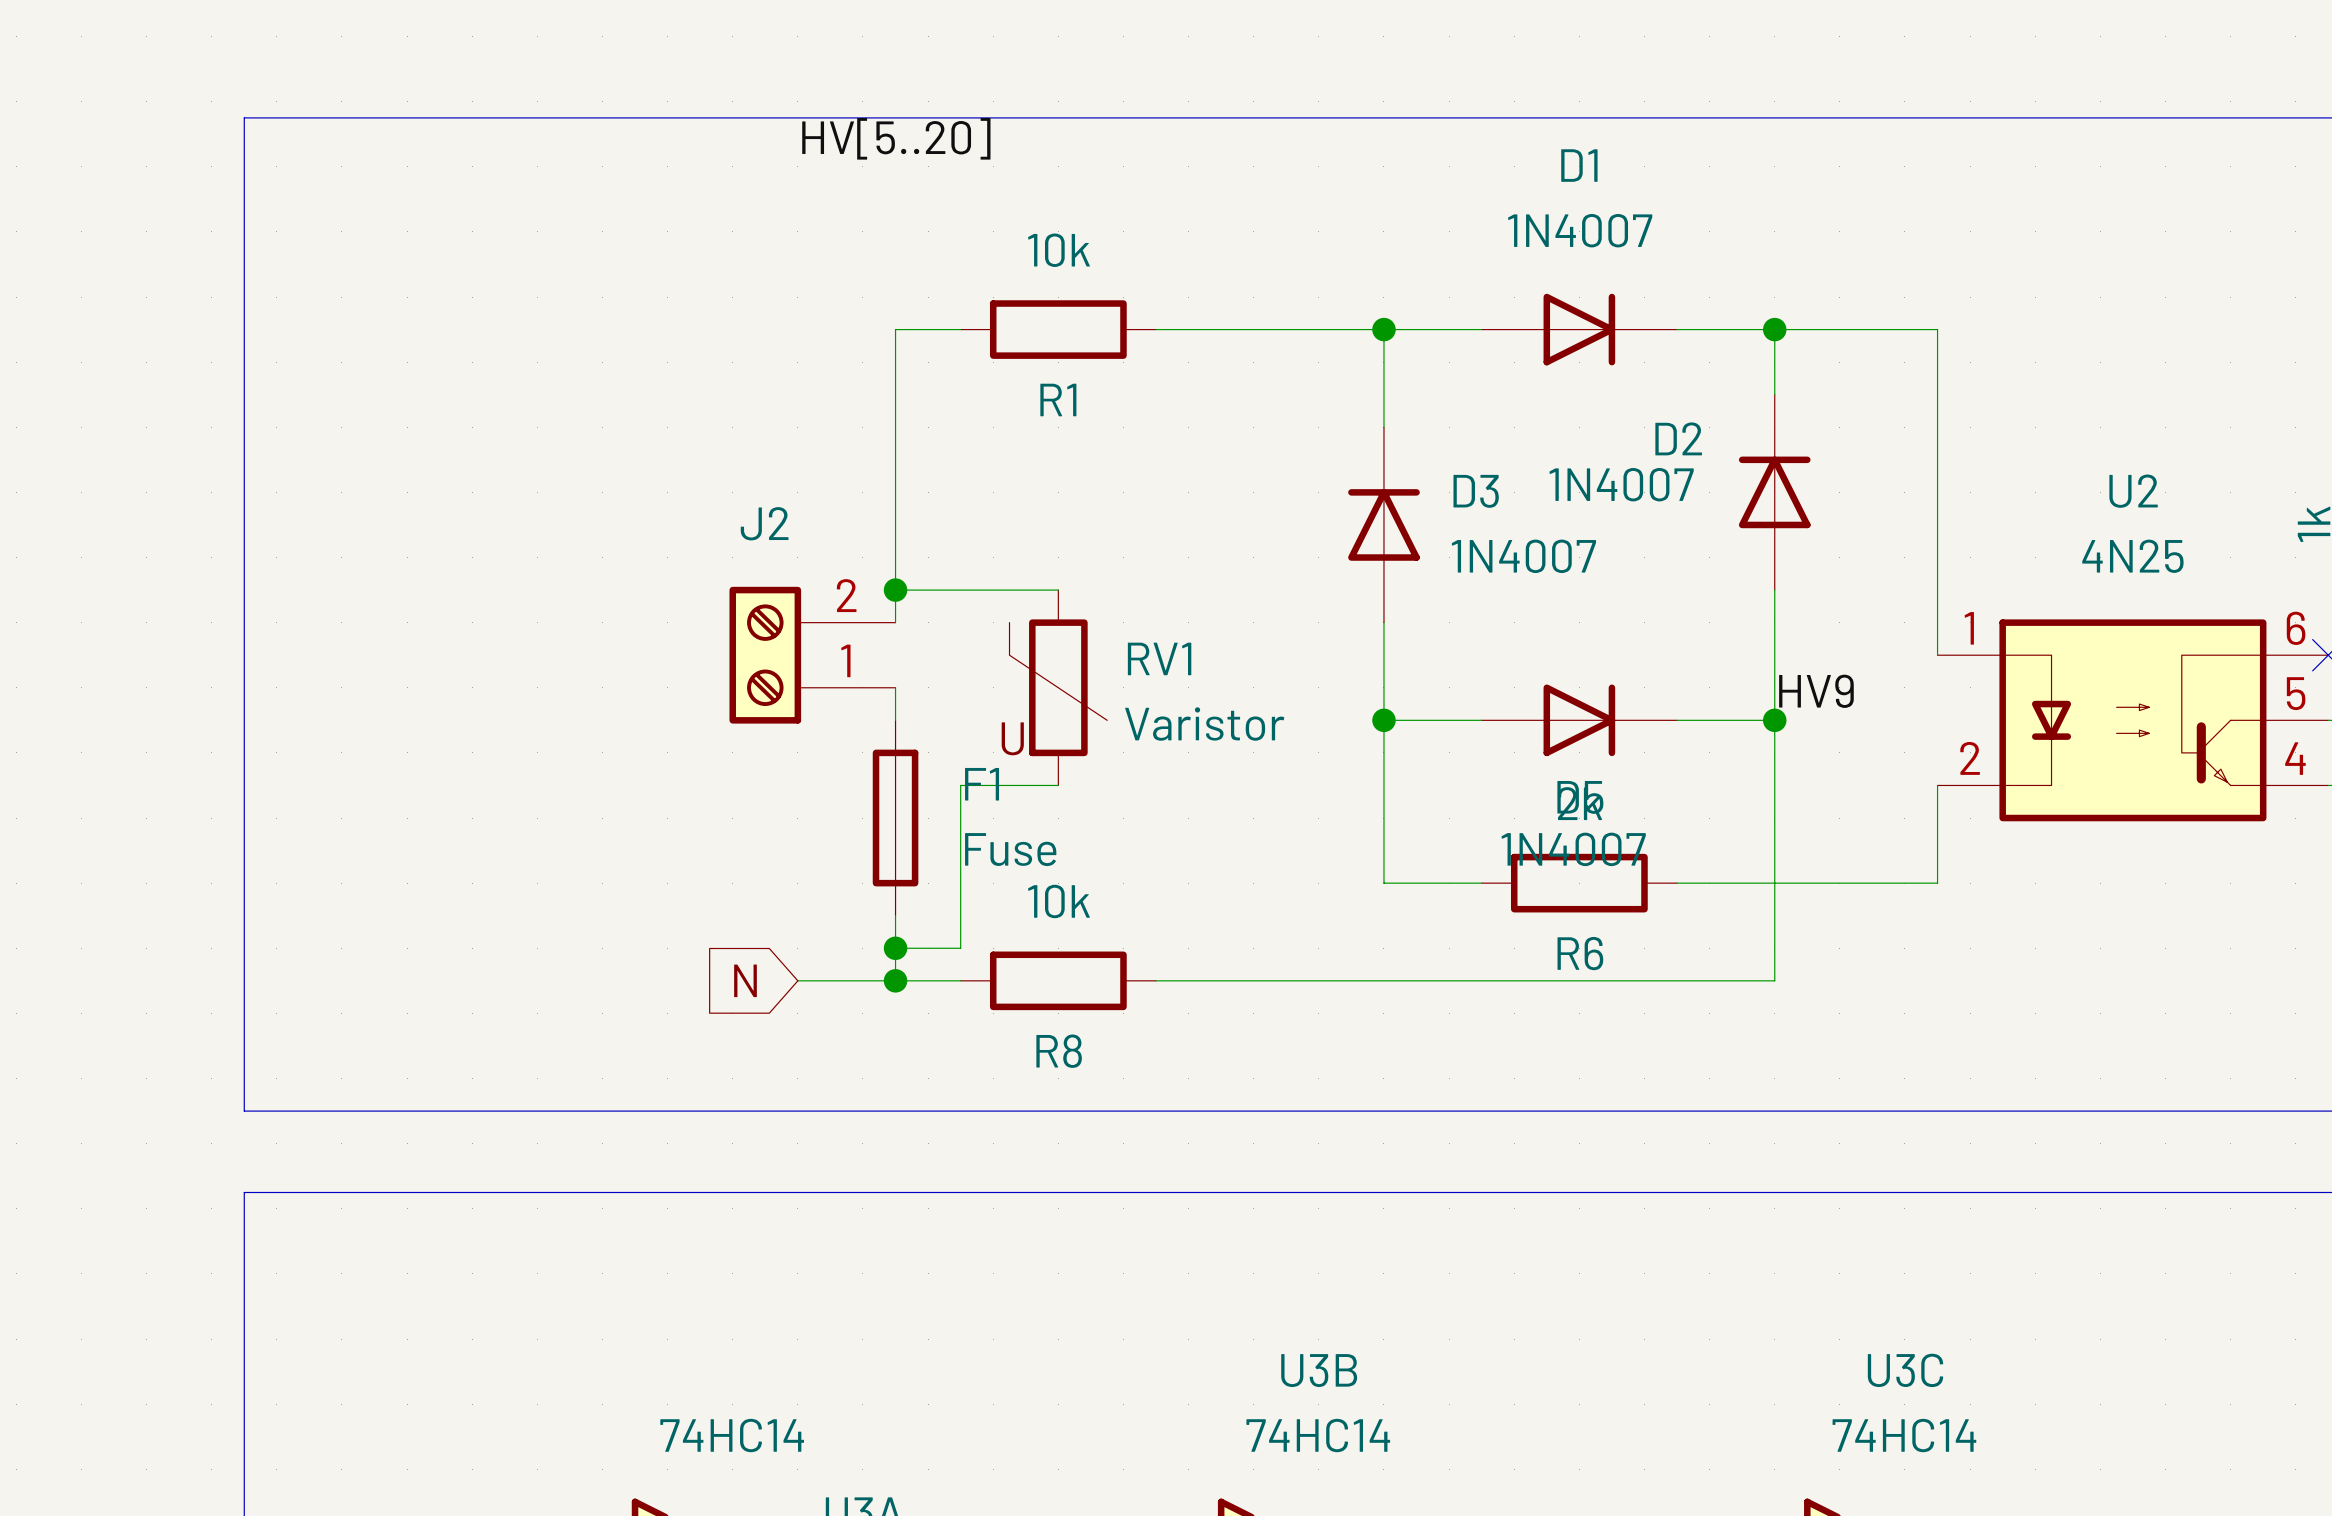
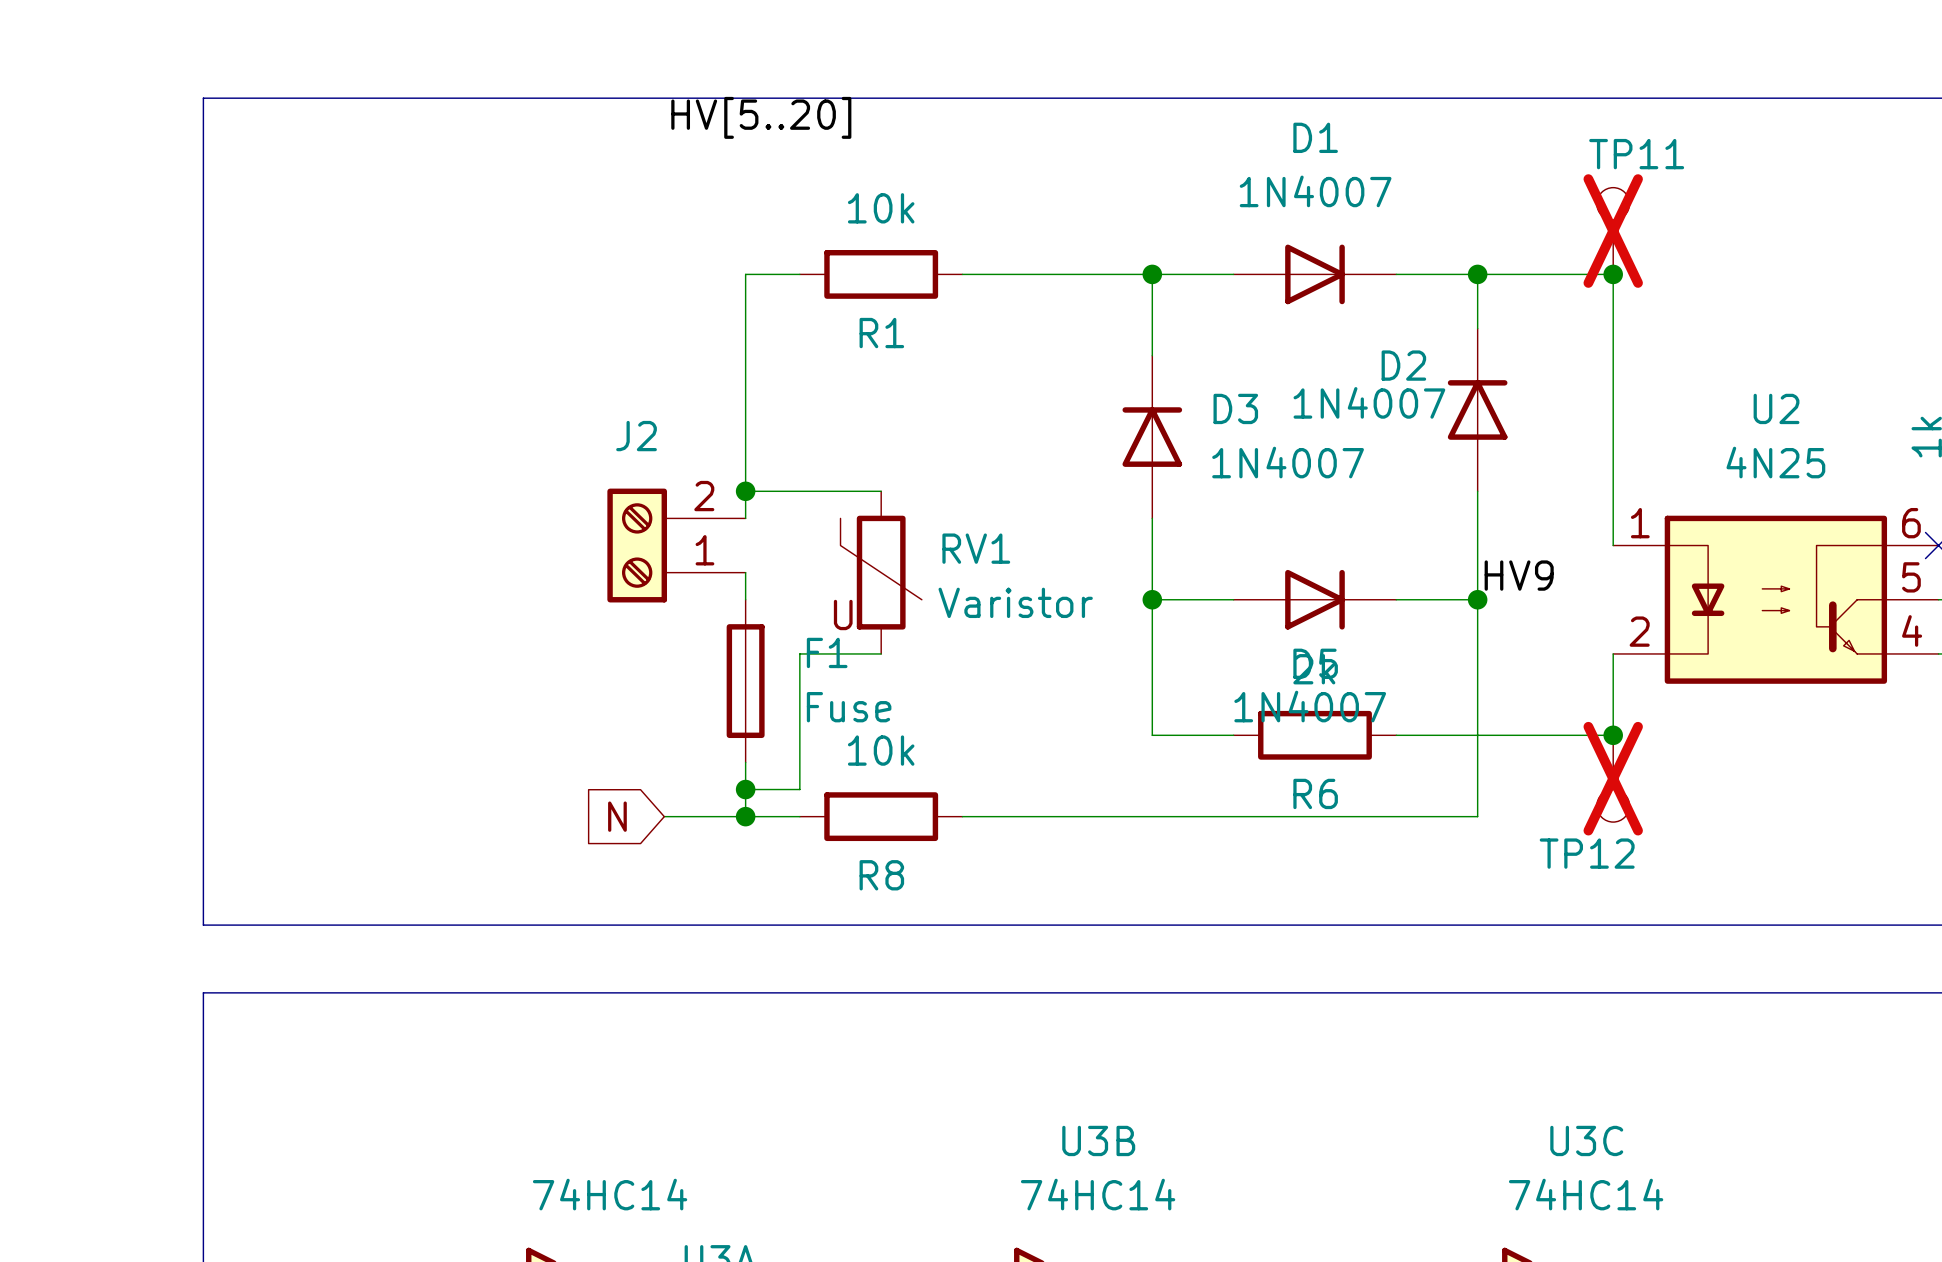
TP11: none -> (1613, 231)
junction: none -> (1613, 274)
junction: none -> (1613, 735)
TP12: none -> (1613, 778)

